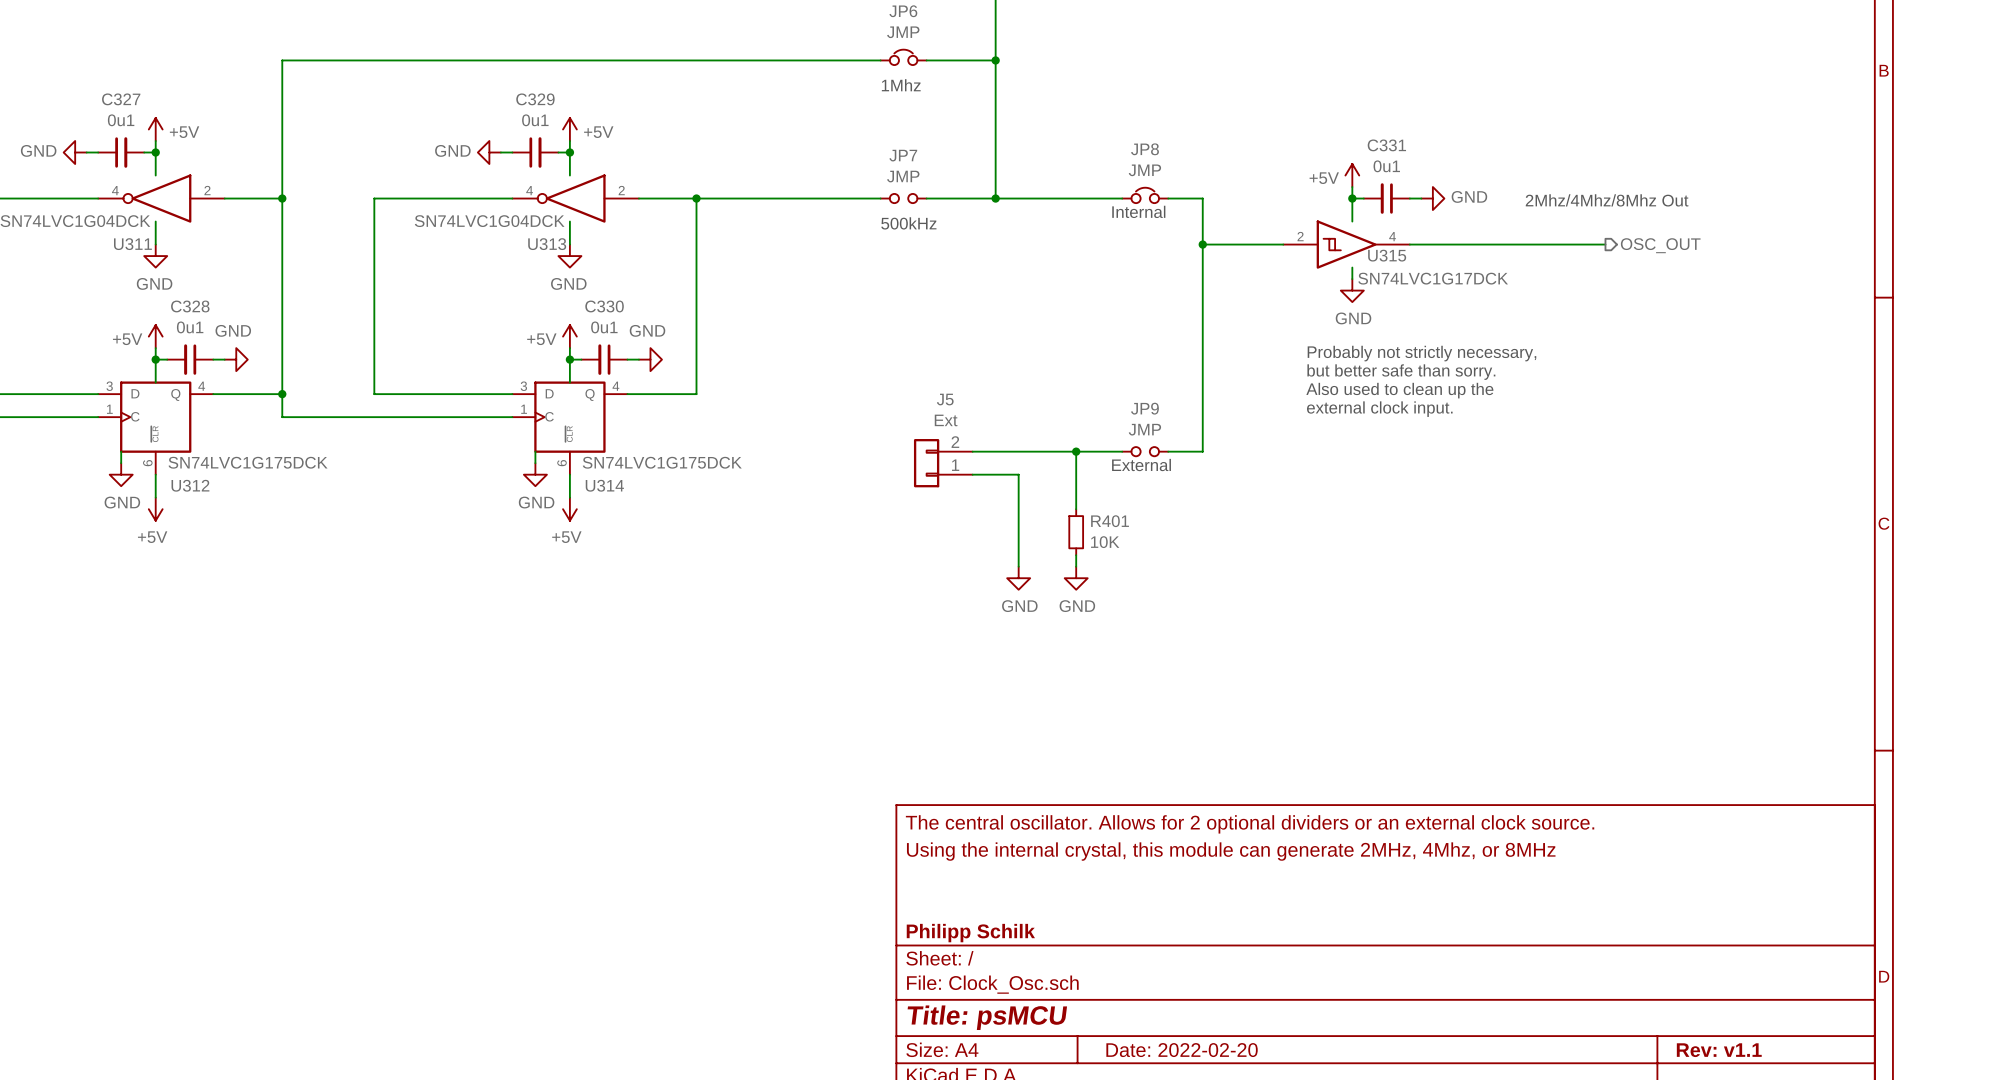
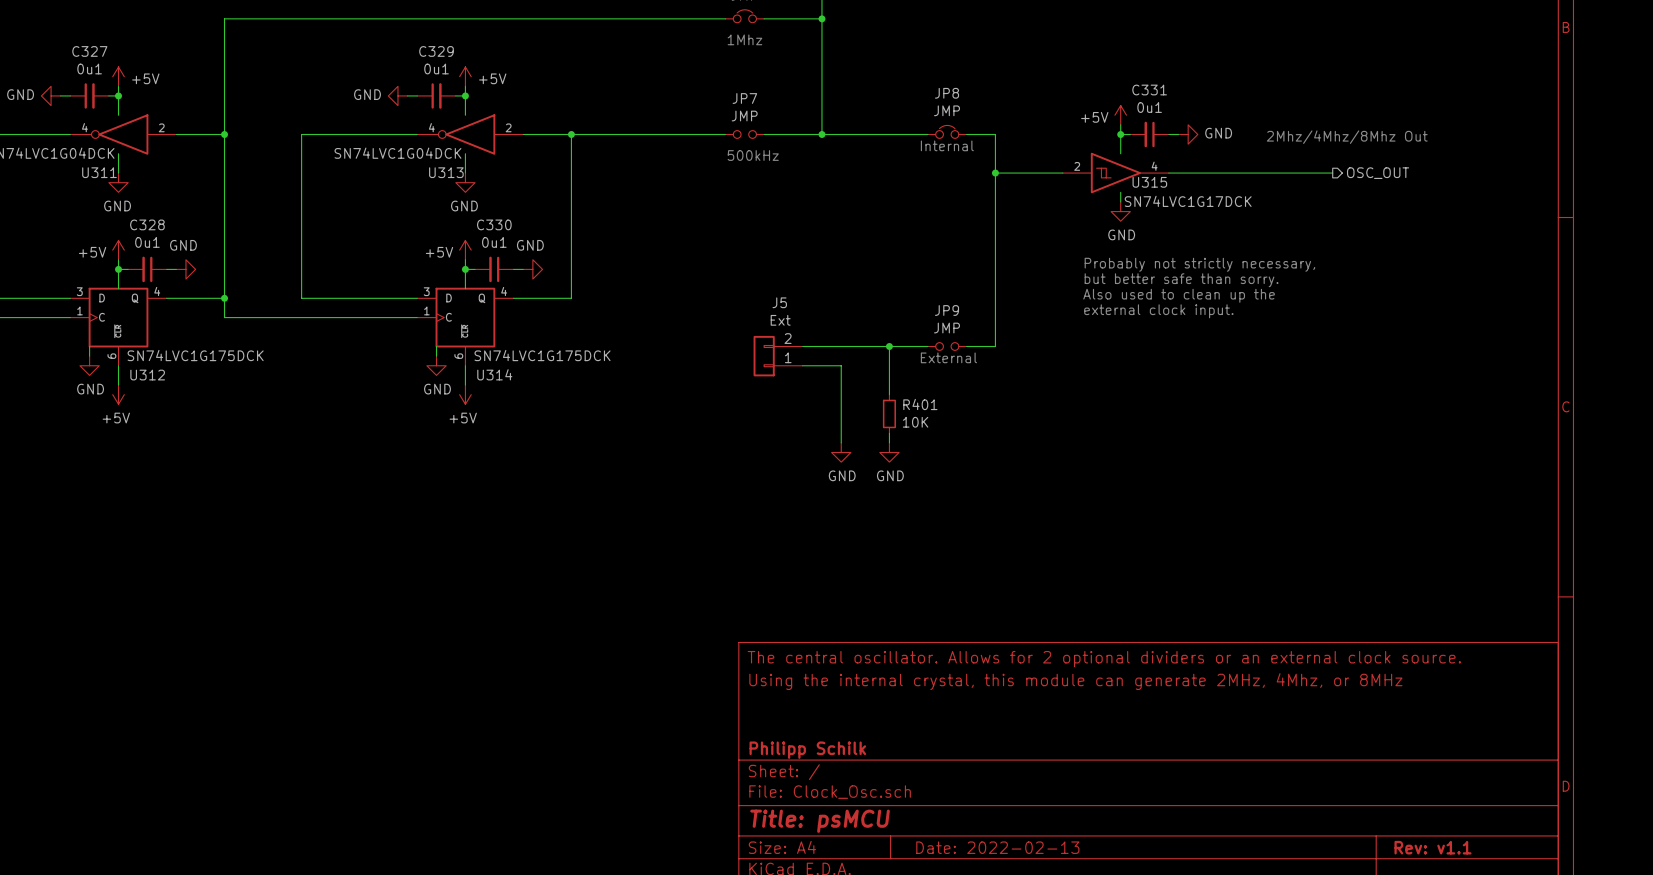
title block: Date: 2022-02-20 (1182, 1050) -> Date: 2022-02-13 (997, 847)

